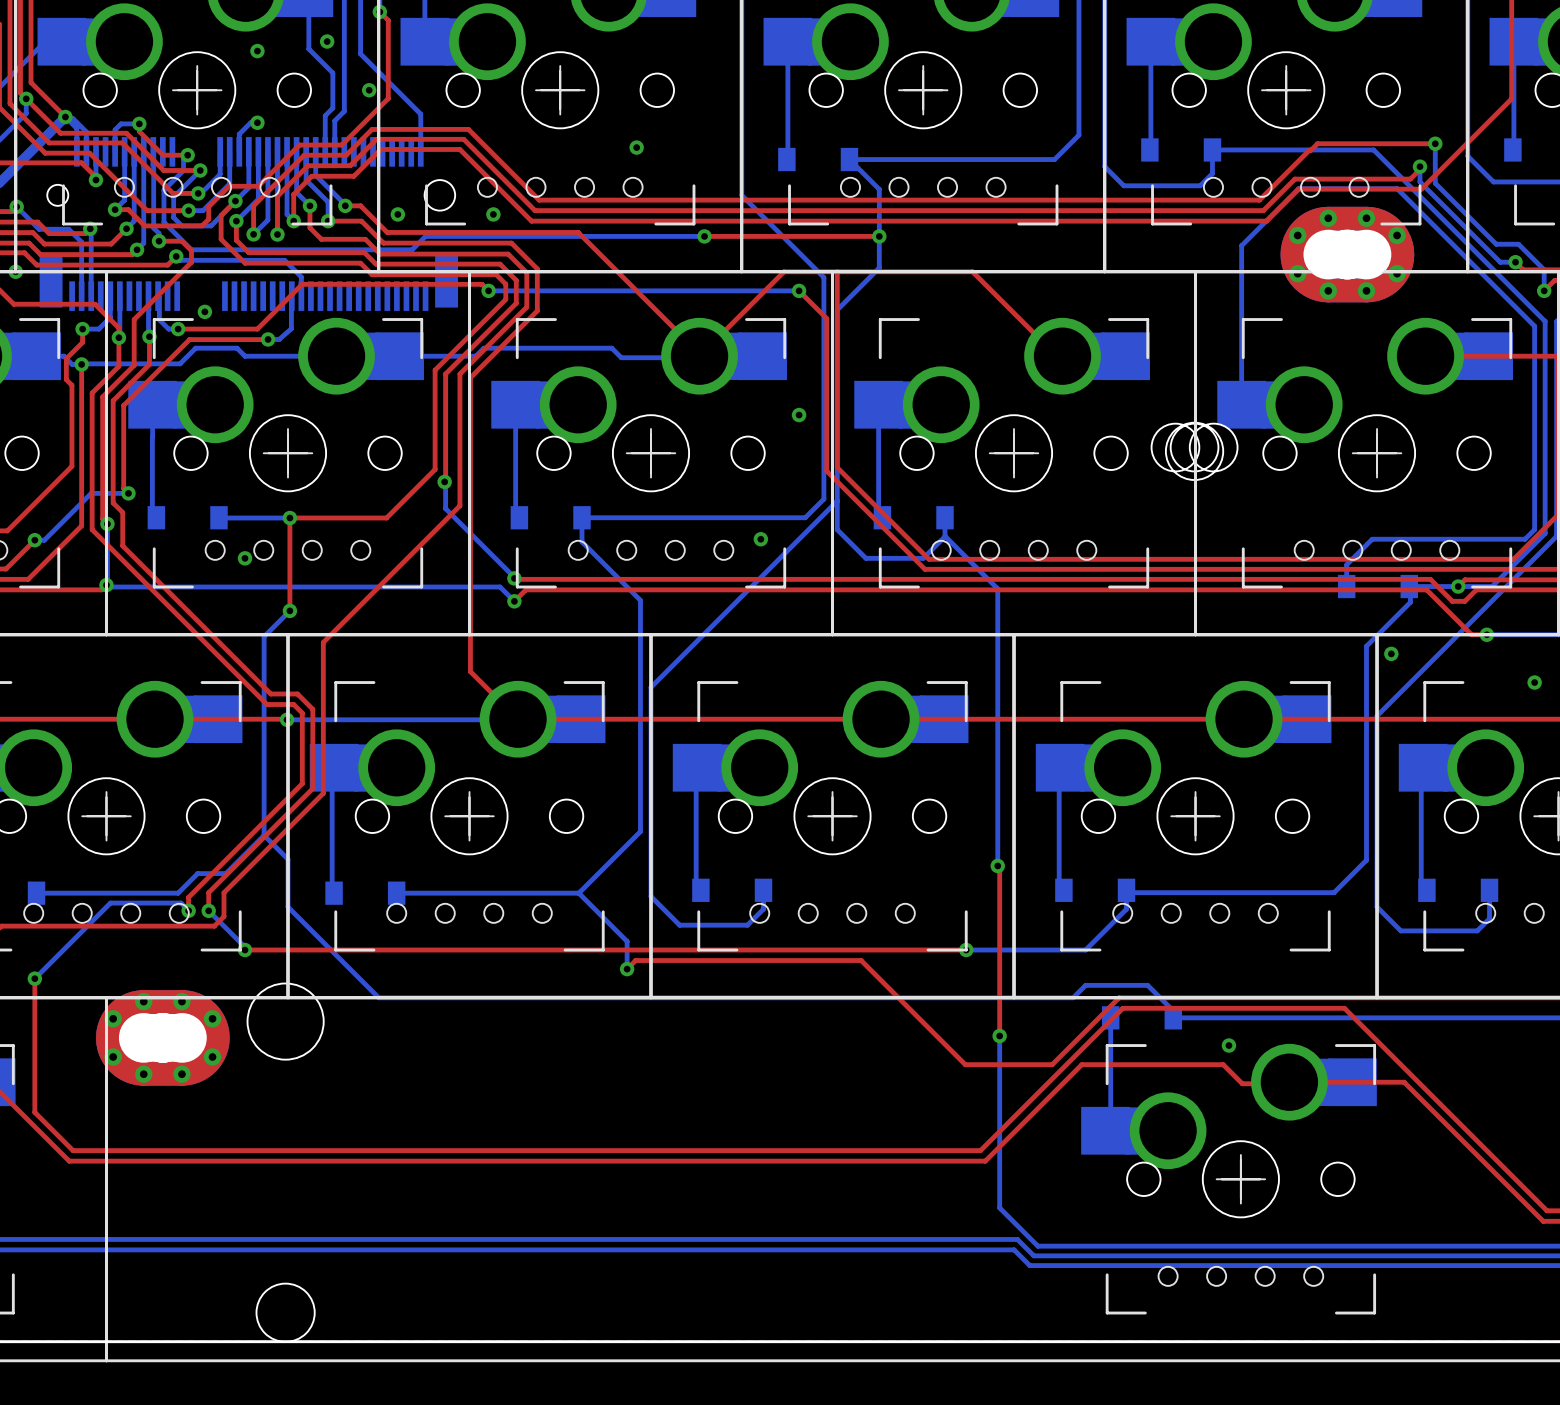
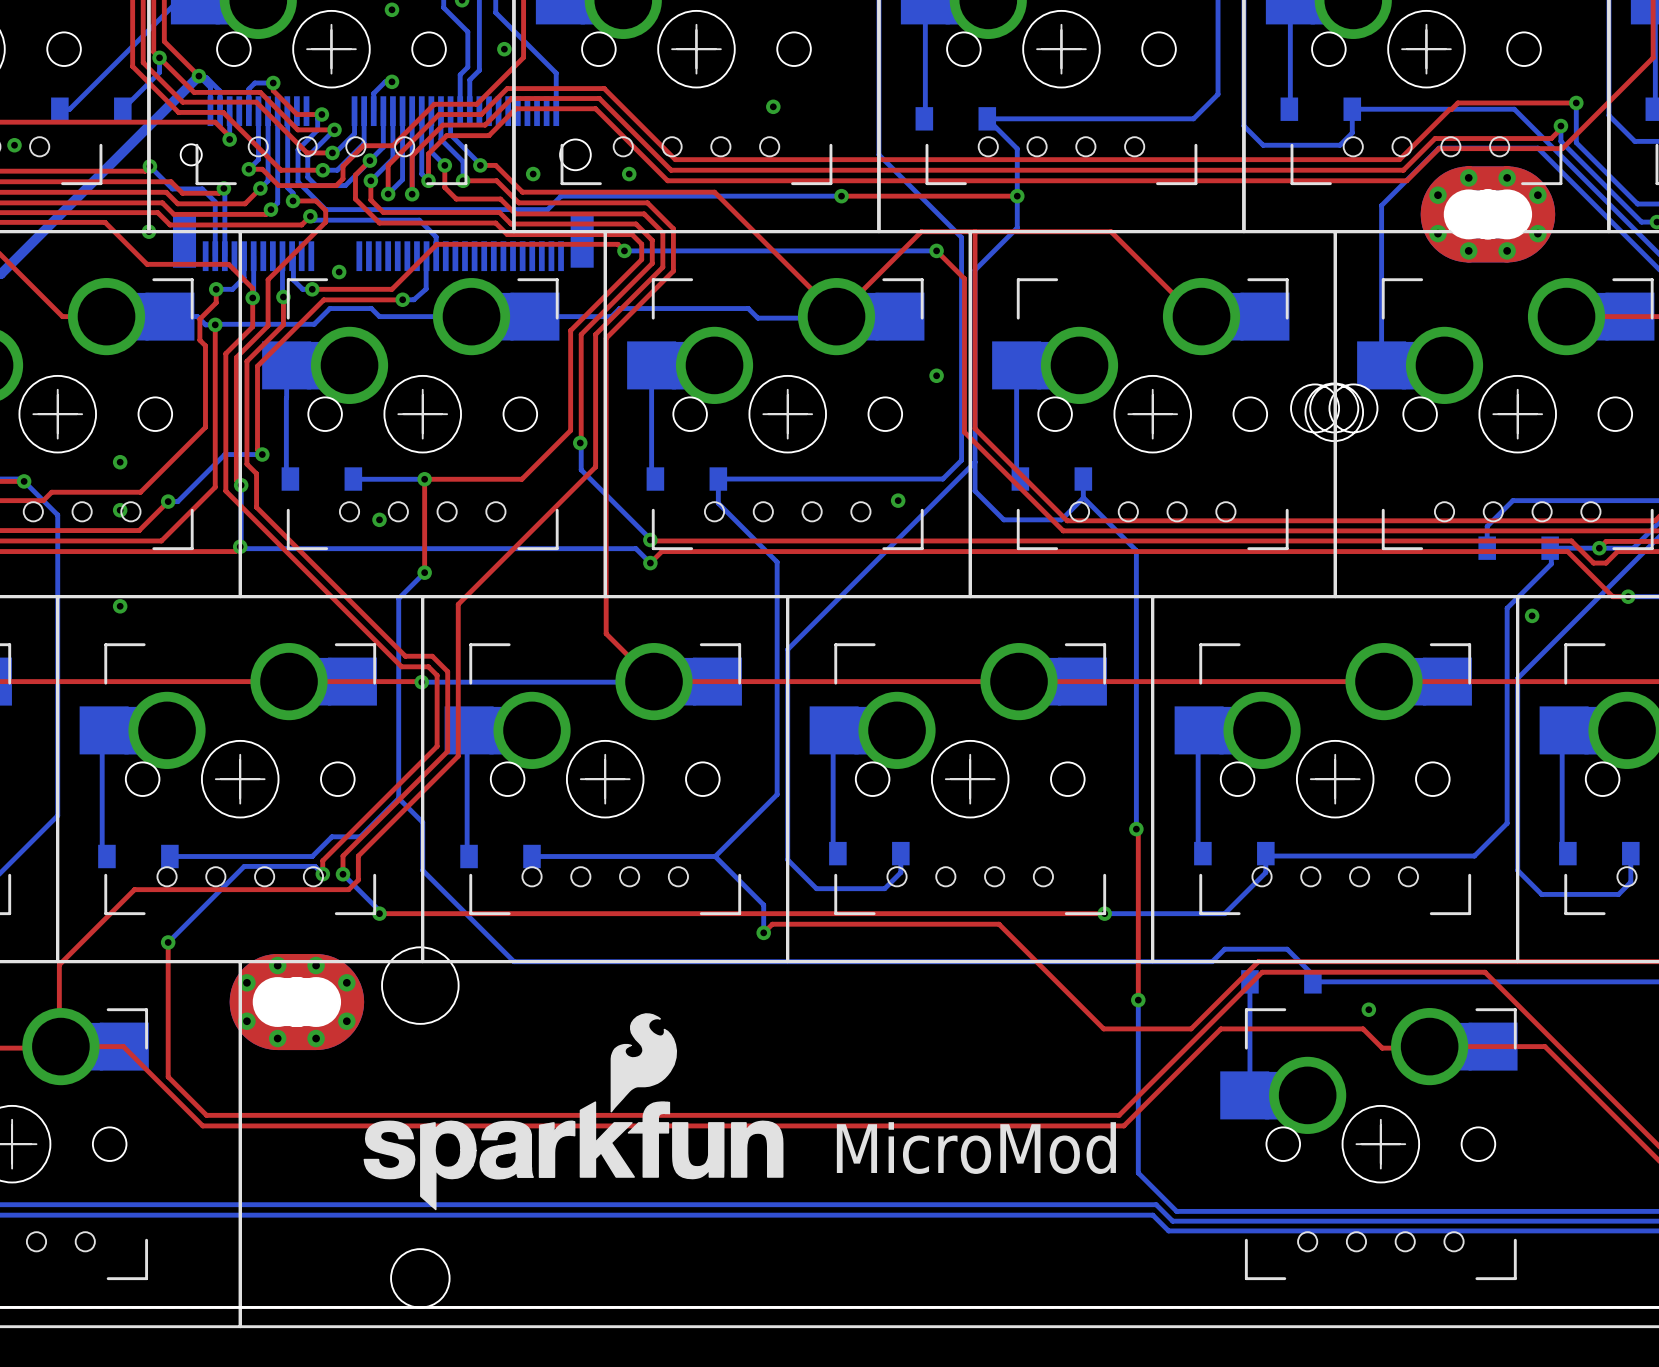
drawing: none -> [363, 1013, 784, 1211]
text: none -> MicroMod (976, 1148)

